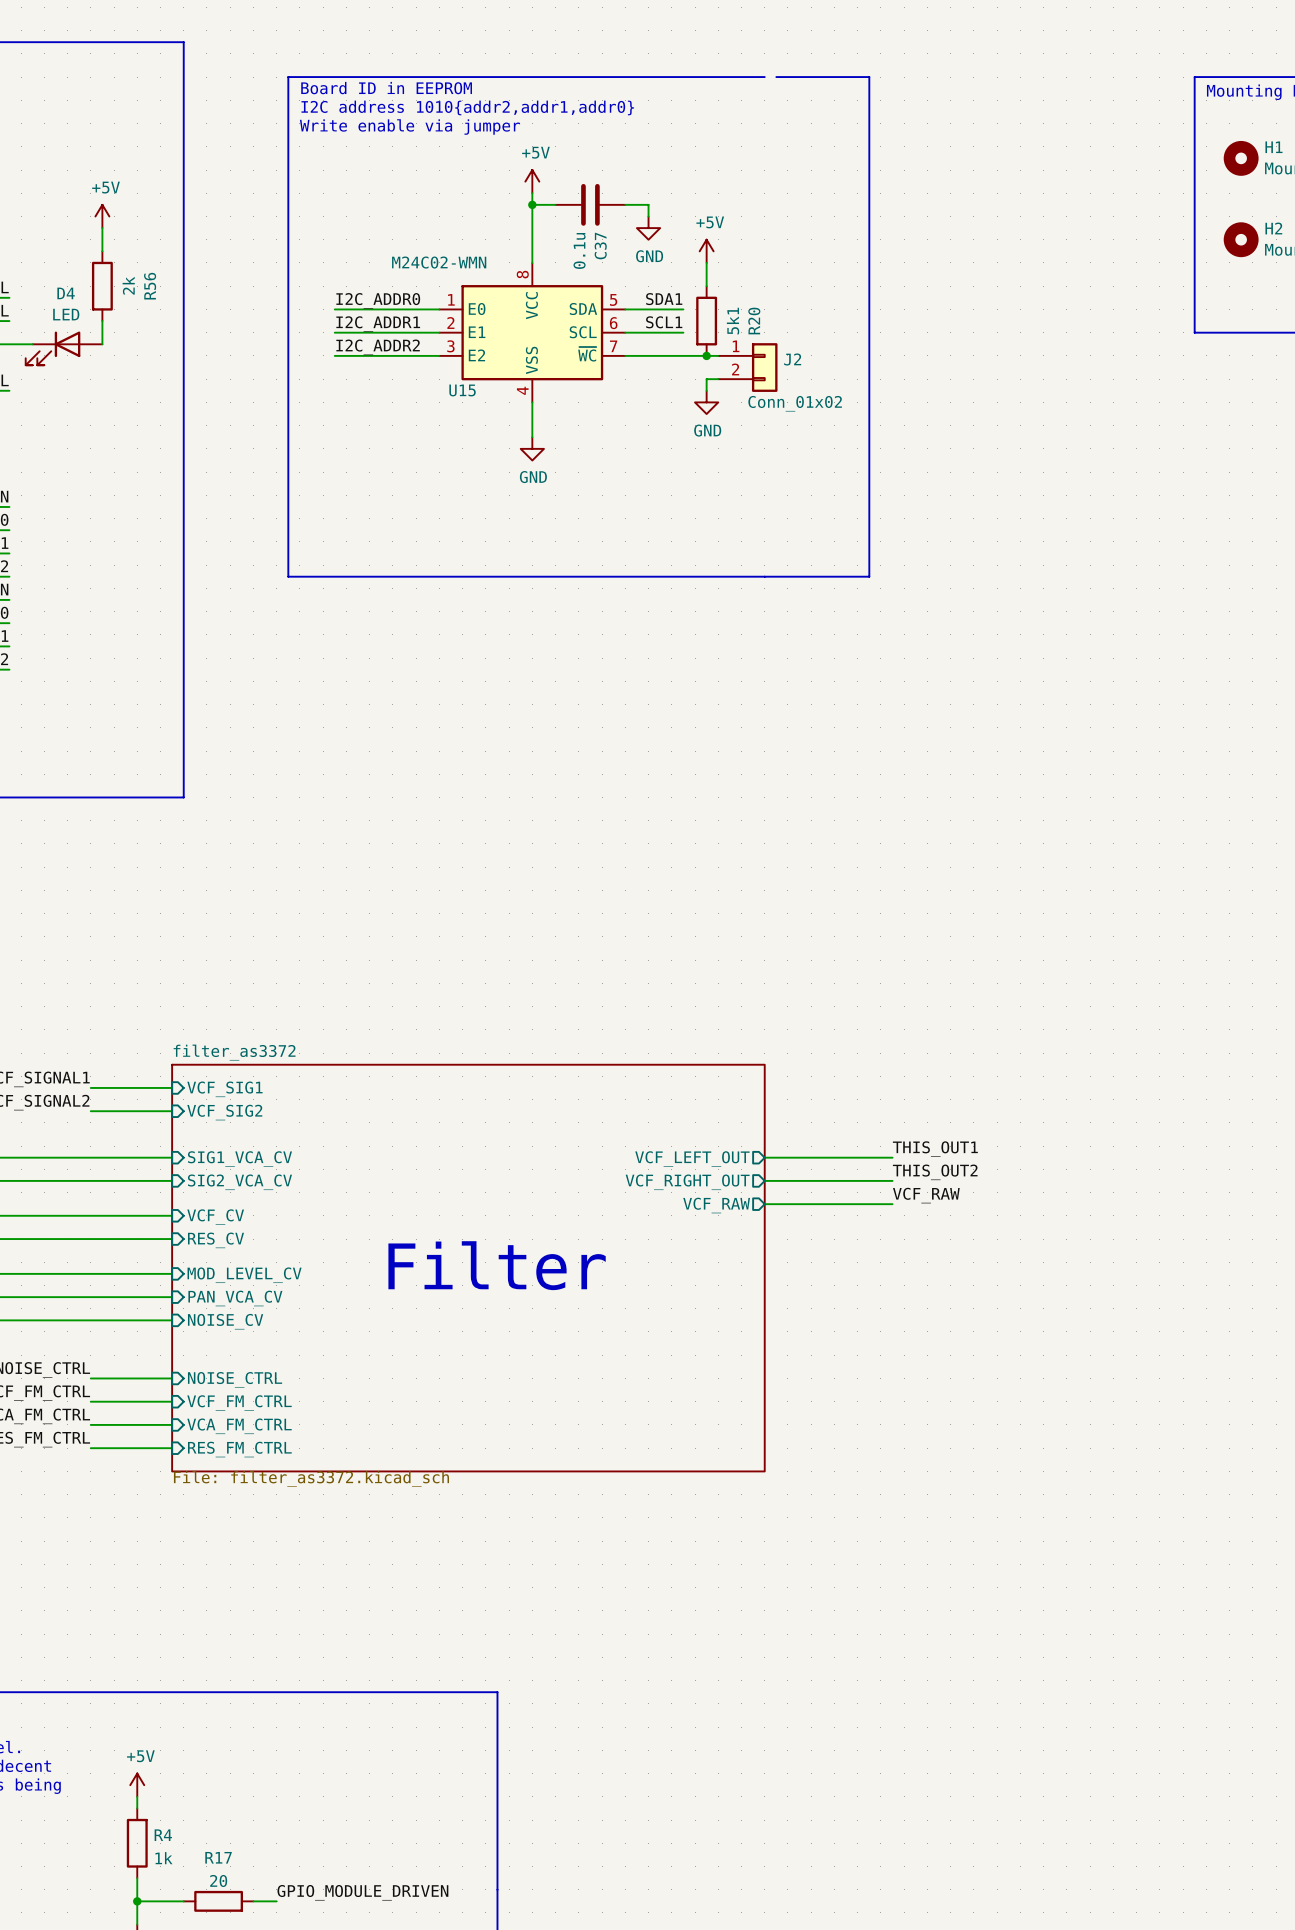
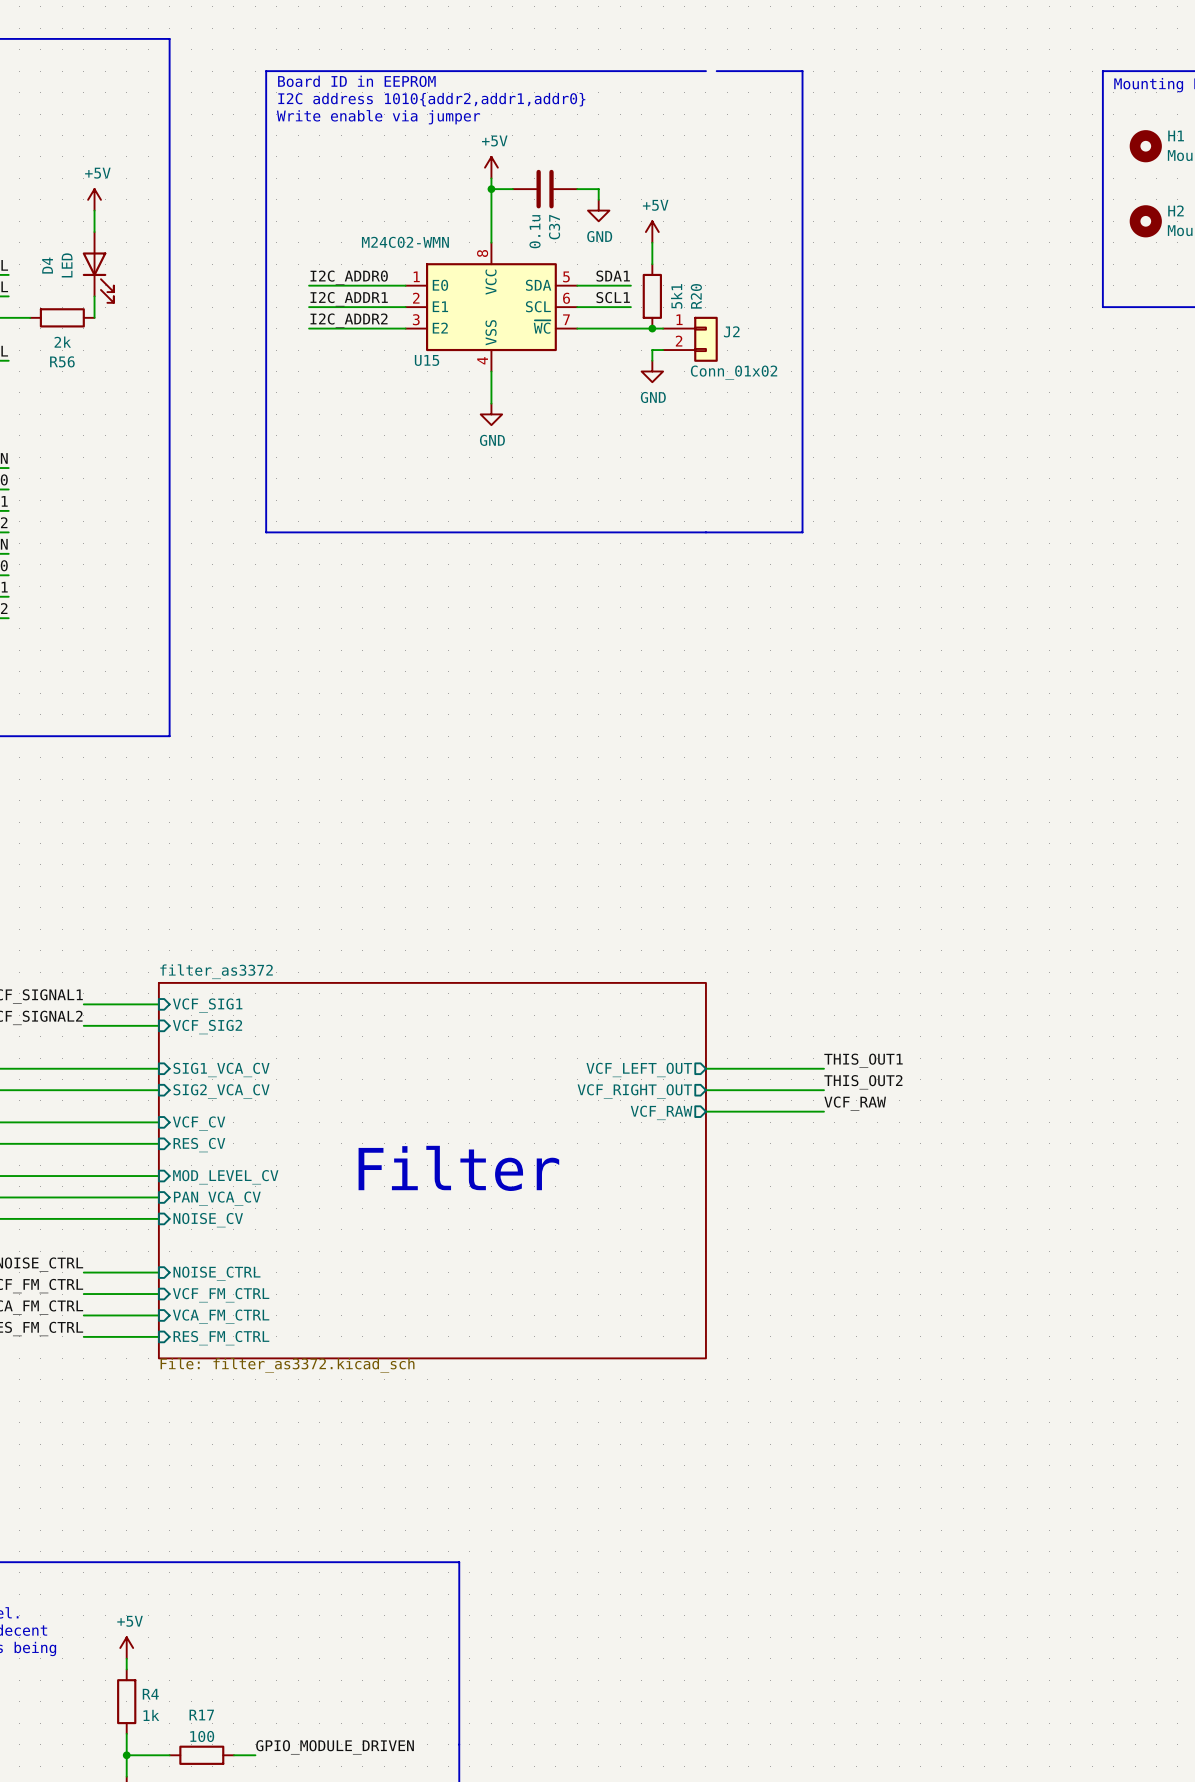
R56 rotation: 0° (102, 286) -> 90° clockwise (62, 317)
R56 position: (102, 286) -> (62, 317)
D4 rotation: 0° (53, 348) -> 90° counterclockwise (98, 277)
D4 position: (64, 348) -> (98, 267)
R17 value: 20 (218, 1881) -> 100 (202, 1736)

